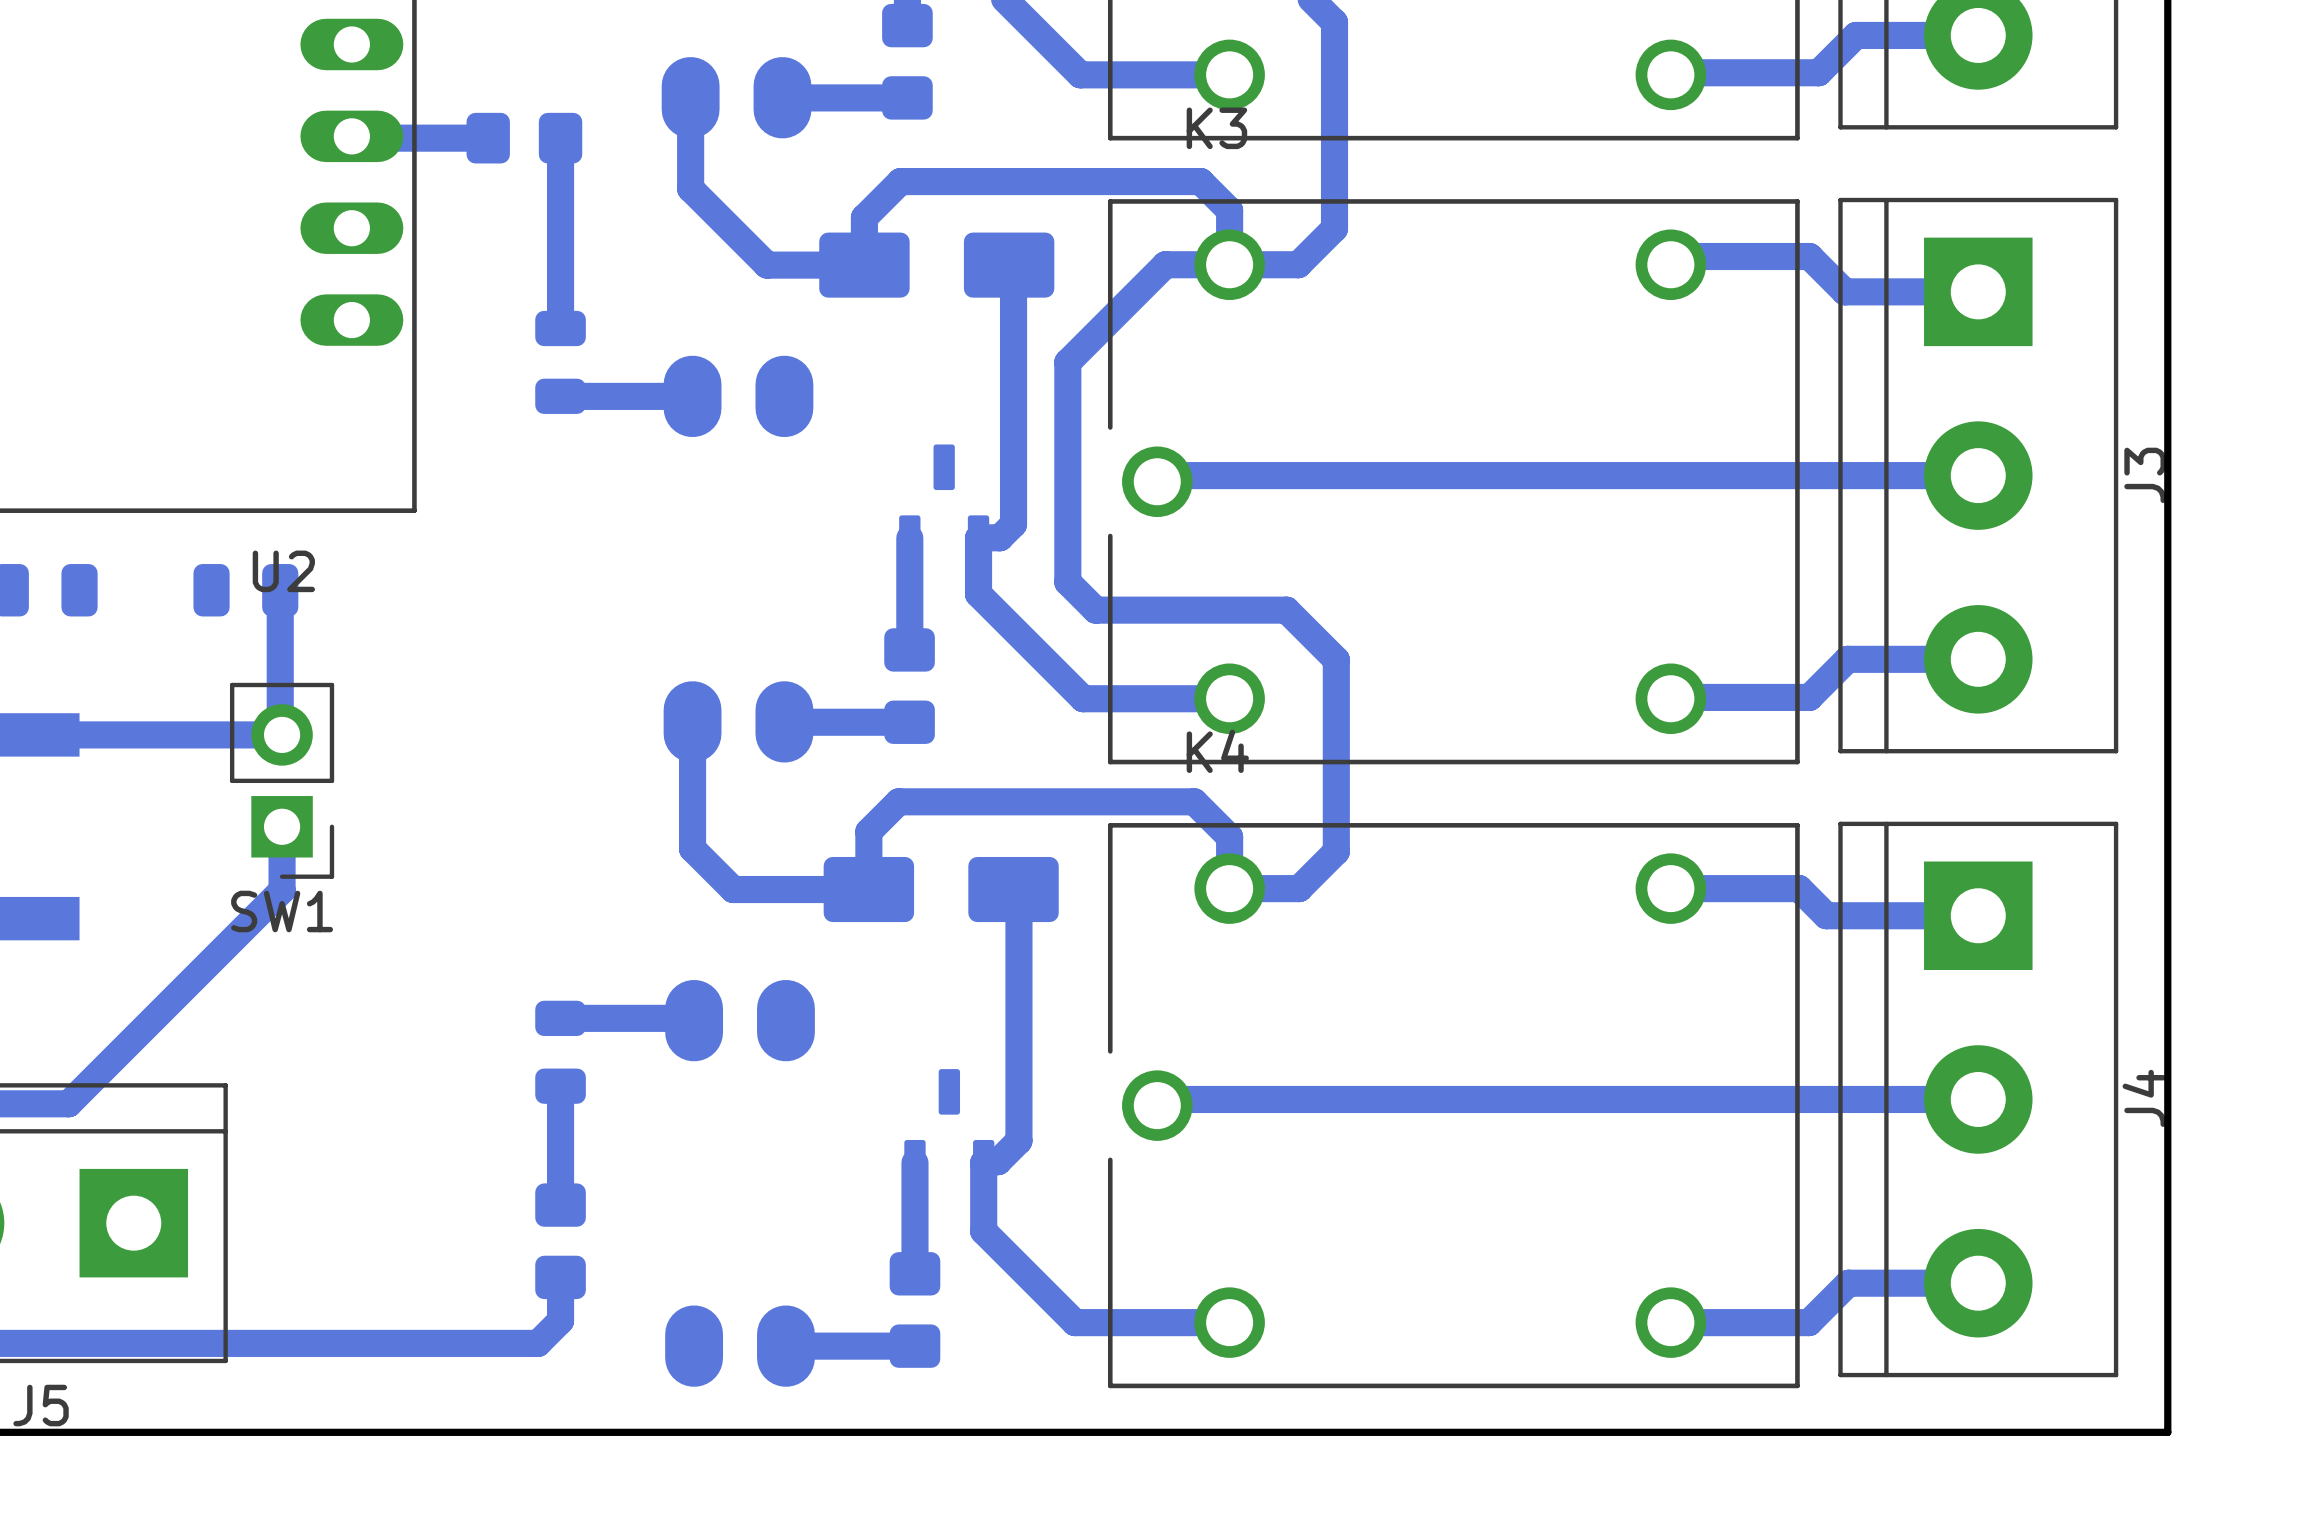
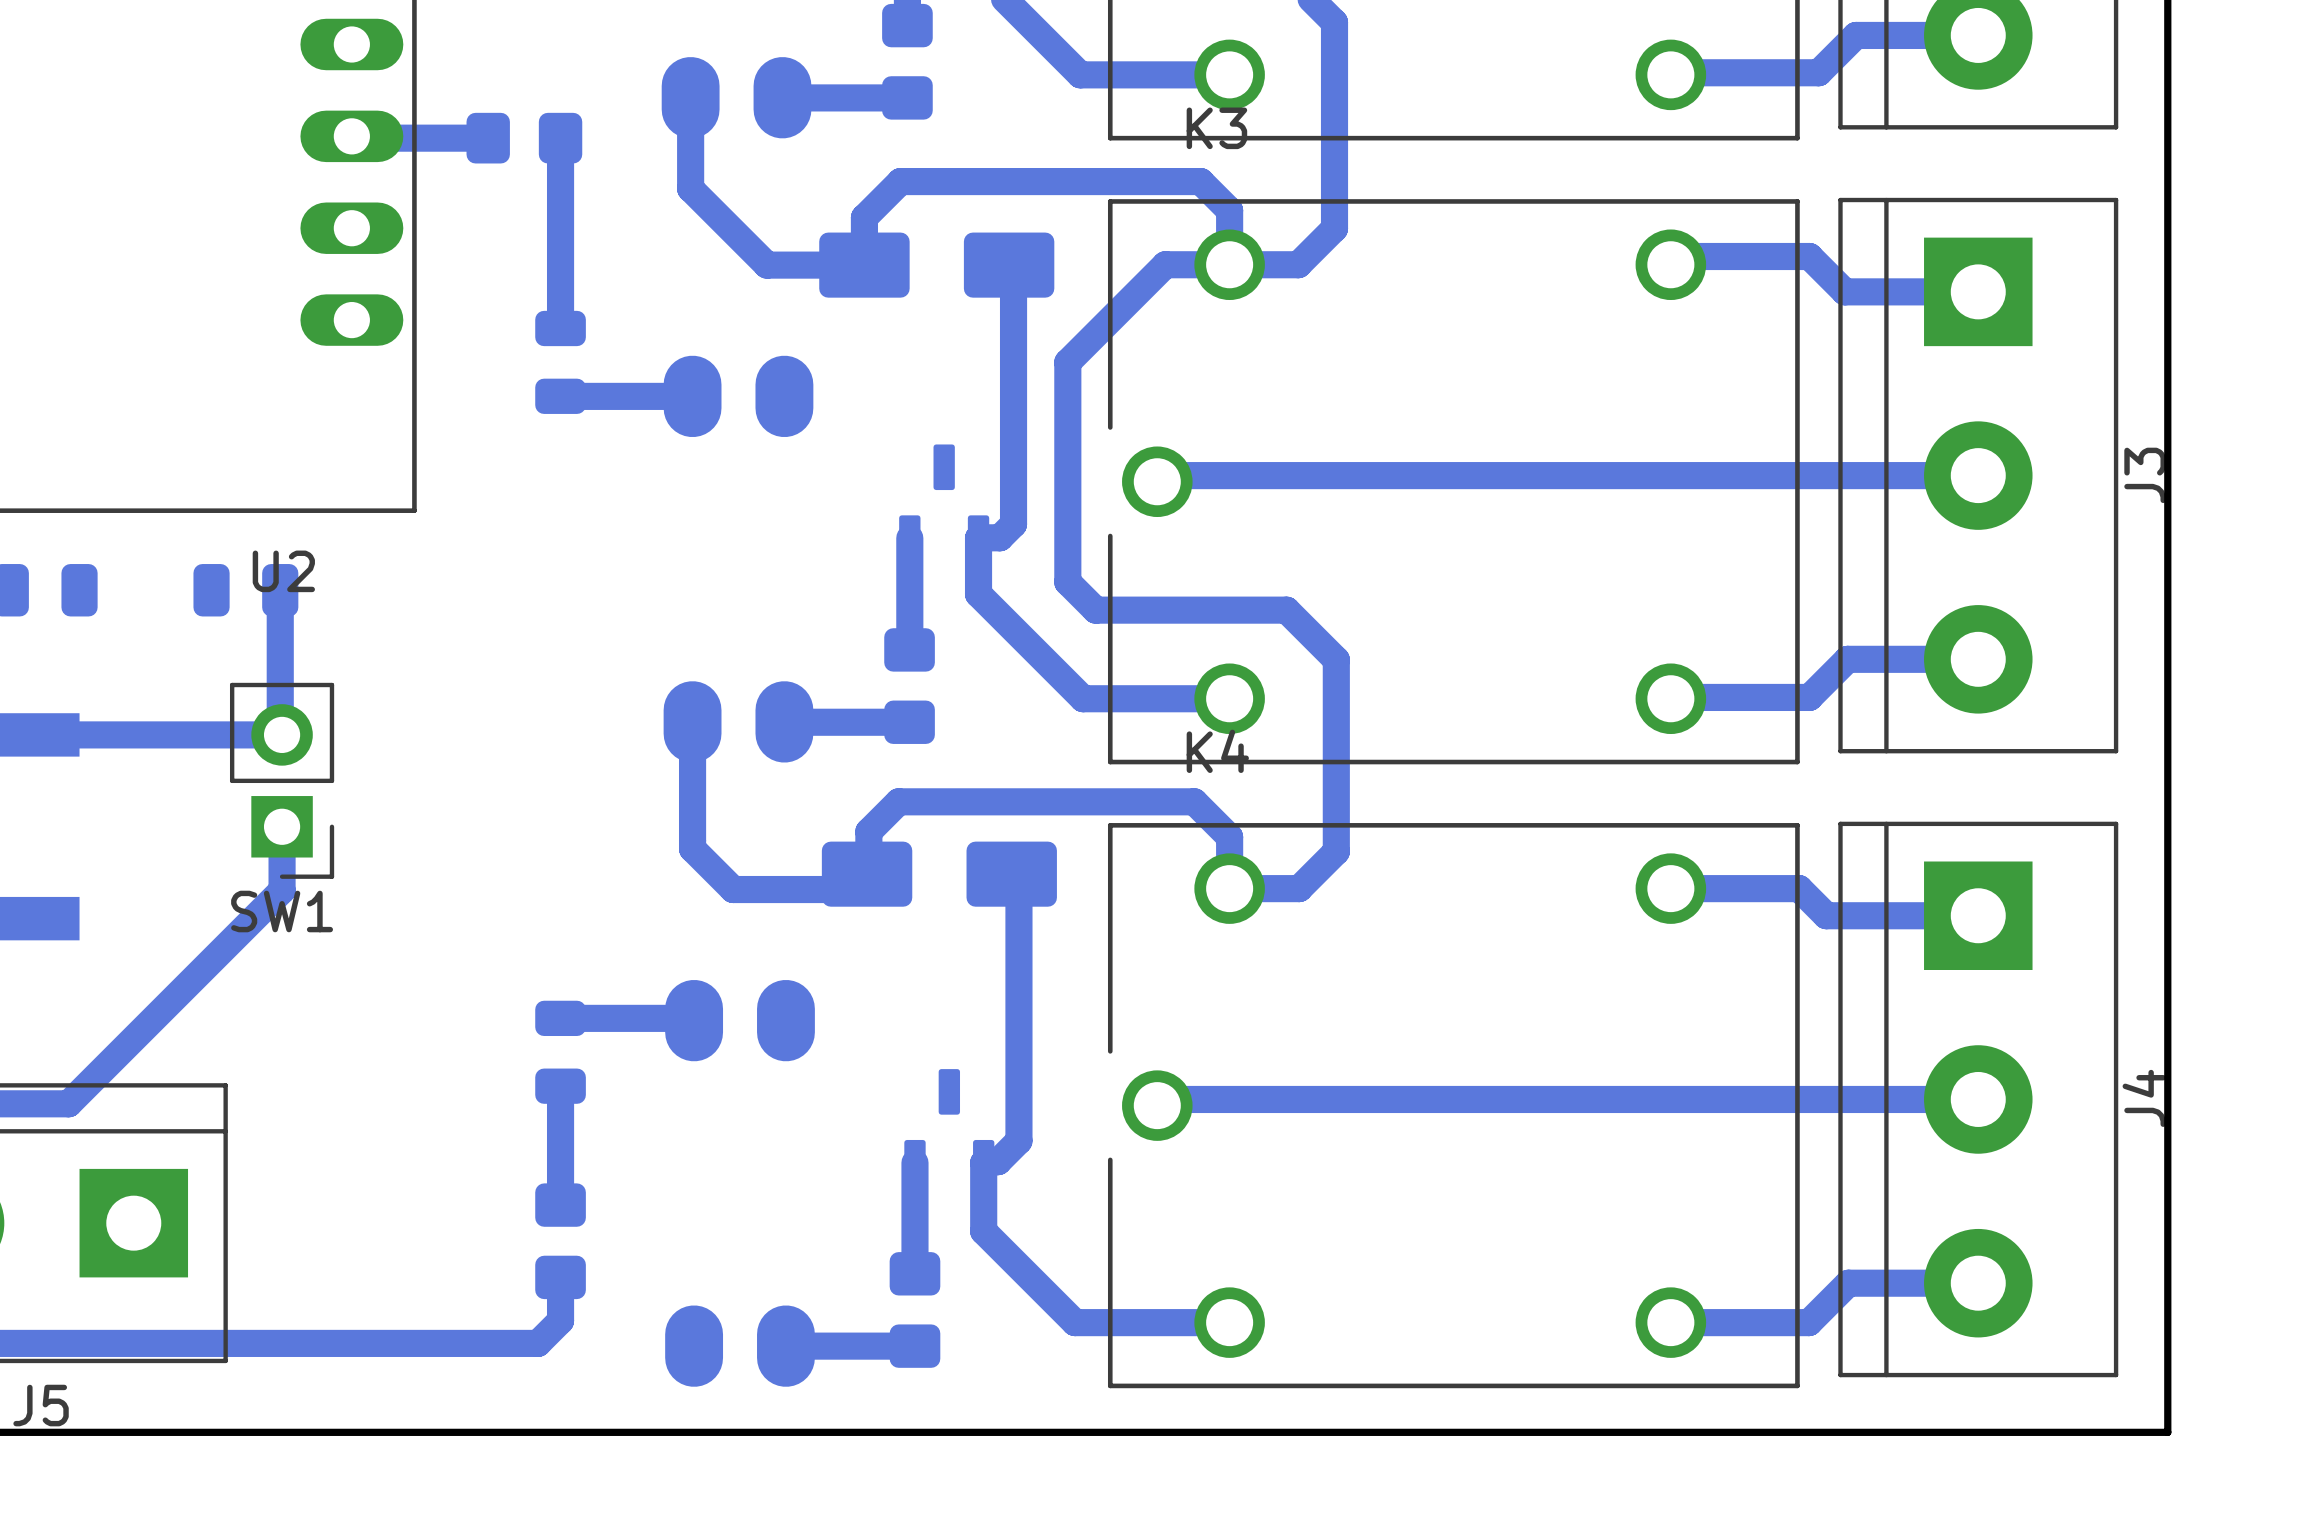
part position: (941, 889) -> (939, 874)

